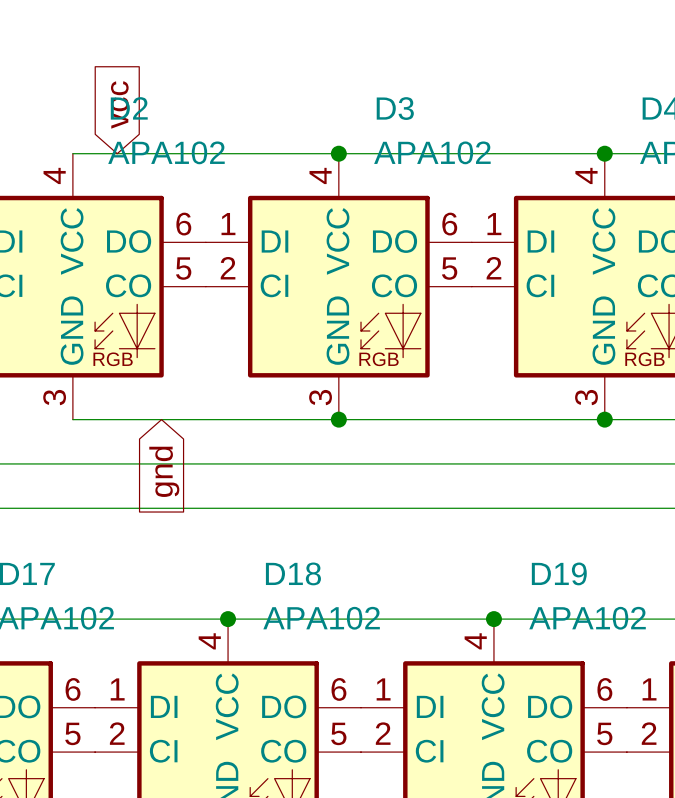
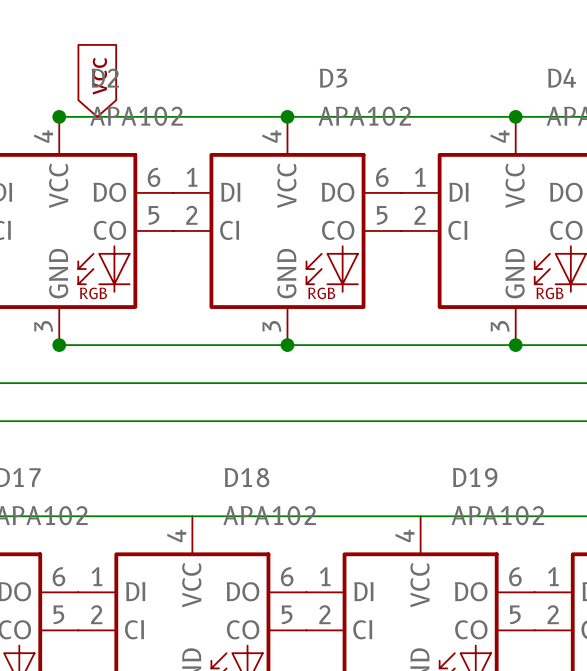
junction: none -> (59, 116)
junction: none -> (59, 345)
global label: gnd (164, 471) -> none
junction: (228, 619) -> none
junction: (493, 619) -> none

